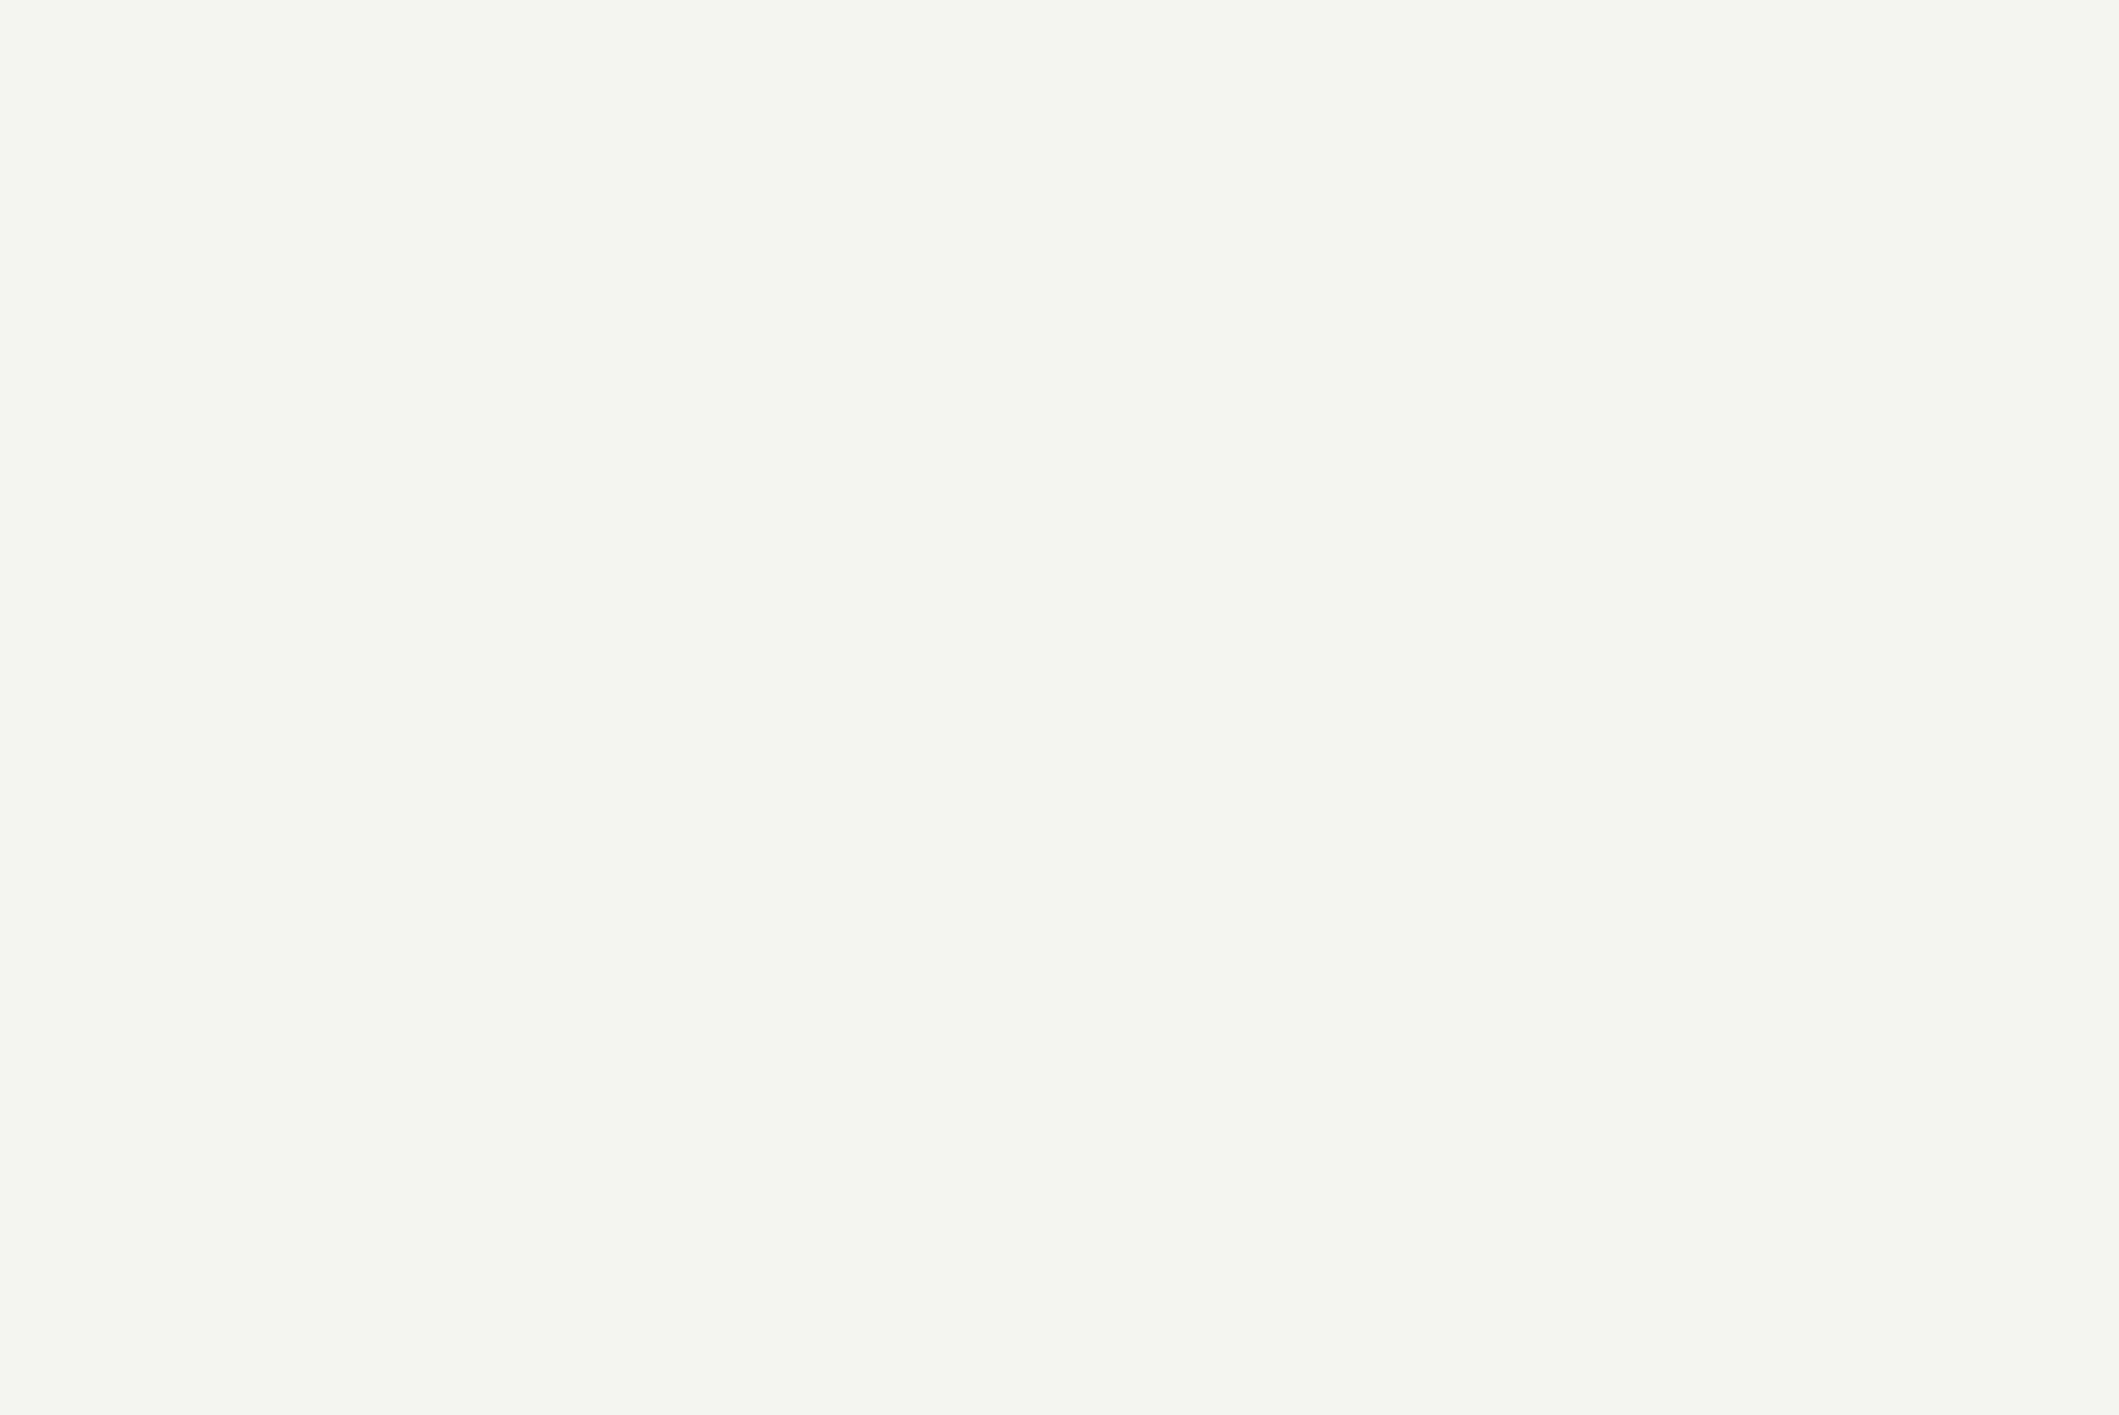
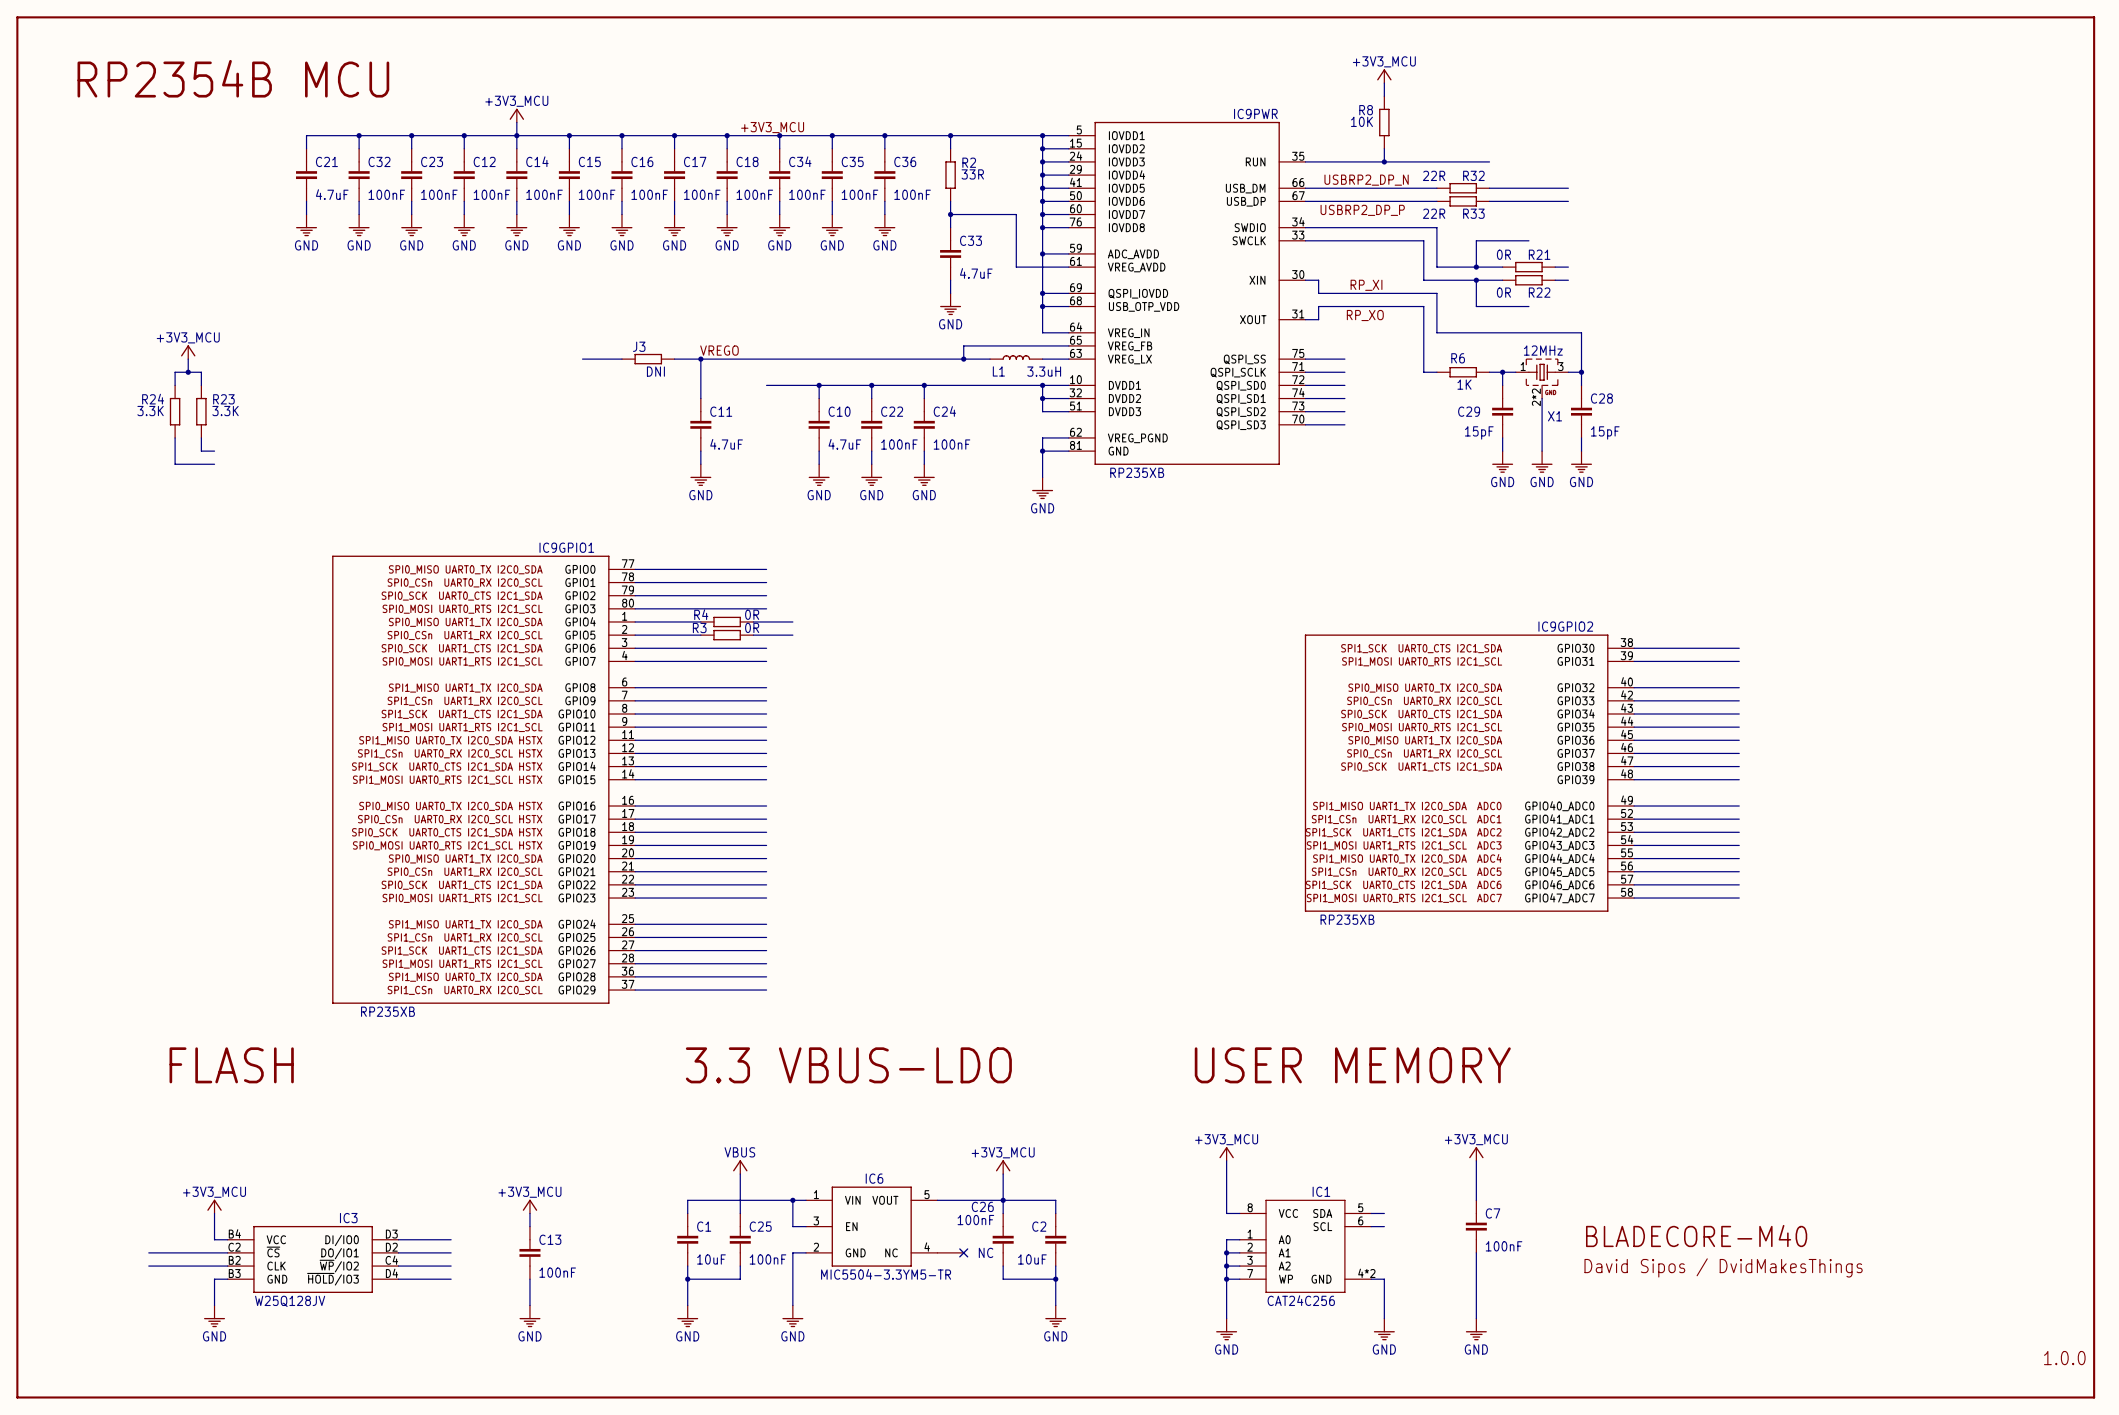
power symbol: none -> +3V3_MCU (1384, 76)
text: none -> RP2354B MCU (233, 78)
wire: none -> (1384, 83) (1384, 96)
power symbol: none -> +3V3_MCU (516, 115)
wire: none -> (516, 122) (516, 148)
R8: none -> 10K (1384, 122)
label: none -> +3V3_MCU (772, 127)
wire: none -> (359, 135) (359, 148)
junction: none -> (359, 135)
wire: none -> (411, 135) (411, 148)
junction: none -> (411, 135)
wire: none -> (464, 135) (464, 148)
junction: none -> (464, 135)
junction: none -> (516, 135)
wire: none -> (569, 135) (569, 148)
junction: none -> (569, 135)
wire: none -> (621, 135) (621, 148)
junction: none -> (621, 135)
wire: none -> (674, 135) (674, 148)
junction: none -> (674, 135)
wire: none -> (727, 135) (727, 148)
junction: none -> (727, 135)
wire: none -> (779, 135) (779, 148)
junction: none -> (779, 135)
wire: none -> (832, 135) (832, 148)
junction: none -> (832, 135)
wire: none -> (884, 135) (884, 148)
junction: none -> (884, 135)
wire: none -> (950, 135) (950, 148)
junction: none -> (950, 135)
wire: none -> (1042, 135) (1042, 332) (1068, 332)
junction: none -> (1042, 135)
wire: none -> (1068, 135) (306, 135) (306, 148)
wire: none -> (1042, 148) (1068, 148)
junction: none -> (1042, 148)
wire: none -> (1384, 148) (1384, 161)
wire: none -> (1042, 161) (1068, 161)
junction: none -> (1042, 161)
wire: none -> (1305, 161) (1489, 161)
junction: none -> (1384, 161)
C21: none -> 4.7uF (306, 175)
C32: none -> 100nF (359, 175)
C23: none -> 100nF (411, 175)
C12: none -> 100nF (464, 175)
C14: none -> 100nF (516, 175)
C15: none -> 100nF (569, 175)
C16: none -> 100nF (621, 175)
C17: none -> 100nF (674, 175)
C18: none -> 100nF (727, 175)
C34: none -> 100nF (779, 175)
C35: none -> 100nF (832, 175)
C36: none -> 100nF (884, 175)
R2: none -> 33R (950, 175)
wire: none -> (1042, 175) (1068, 175)
junction: none -> (1042, 175)
label: none -> USBRP2_DP_N (1366, 180)
wire: none -> (1042, 188) (1068, 188)
junction: none -> (1042, 188)
wire: none -> (1305, 188) (1436, 188)
R32: none -> 22R (1463, 188)
wire: none -> (1489, 188) (1568, 188)
wire: none -> (306, 201) (306, 214)
wire: none -> (359, 201) (359, 214)
wire: none -> (411, 201) (411, 214)
wire: none -> (464, 201) (464, 214)
wire: none -> (516, 201) (516, 214)
wire: none -> (569, 201) (569, 214)
wire: none -> (621, 201) (621, 214)
wire: none -> (674, 201) (674, 214)
wire: none -> (727, 201) (727, 214)
wire: none -> (779, 201) (779, 214)
wire: none -> (832, 201) (832, 214)
wire: none -> (884, 201) (884, 214)
wire: none -> (950, 201) (950, 227)
wire: none -> (1042, 201) (1068, 201)
junction: none -> (1042, 201)
wire: none -> (1305, 201) (1436, 201)
R33: none -> 22R (1463, 201)
wire: none -> (1489, 201) (1568, 201)
label: none -> USBRP2_DP_P (1362, 210)
wire: none -> (950, 214) (1016, 214) (1016, 267) (1068, 267)
junction: none -> (950, 214)
wire: none -> (1042, 214) (1068, 214)
junction: none -> (1042, 214)
power symbol: none -> GND (306, 225)
power symbol: none -> GND (359, 225)
power symbol: none -> GND (411, 225)
power symbol: none -> GND (464, 225)
power symbol: none -> GND (516, 225)
power symbol: none -> GND (569, 225)
power symbol: none -> GND (621, 225)
power symbol: none -> GND (674, 225)
power symbol: none -> GND (727, 225)
power symbol: none -> GND (779, 225)
power symbol: none -> GND (832, 225)
power symbol: none -> GND (884, 225)
wire: none -> (1042, 227) (1068, 227)
junction: none -> (1042, 227)
wire: none -> (1305, 227) (1436, 227) (1436, 267) (1502, 267)
wire: none -> (1305, 240) (1423, 240) (1423, 280) (1502, 280)
wire: none -> (1528, 240) (1476, 240) (1476, 267)
C33: none -> 4.7uF (950, 253)
wire: none -> (1042, 253) (1068, 253)
junction: none -> (1042, 253)
junction: none -> (1476, 267)
R21: none -> 0R (1528, 267)
wire: none -> (1555, 267) (1568, 267)
wire: none -> (950, 280) (950, 293)
wire: none -> (1305, 280) (1318, 280) (1318, 293) (1436, 293) (1436, 332) (1581, 332) (1581, 385)
wire: none -> (1476, 280) (1476, 306) (1528, 306)
junction: none -> (1476, 280)
R22: none -> 0R (1528, 280)
wire: none -> (1555, 280) (1568, 280)
label: none -> RP_XI (1366, 285)
wire: none -> (1042, 293) (1068, 293)
junction: none -> (1042, 293)
IC9PWR: none -> RP235XB (1187, 293)
power symbol: none -> GND (950, 304)
wire: none -> (1042, 306) (1068, 306)
junction: none -> (1042, 306)
label: none -> RP_XO (1365, 315)
wire: none -> (1305, 319) (1318, 319) (1318, 306) (1423, 306) (1423, 372) (1436, 372)
wire: none -> (1068, 345) (963, 345) (963, 359)
label: none -> VREGO (719, 350)
power symbol: none -> +3V3_MCU (188, 352)
L1: none -> 3.3uH (1016, 357)
wire: none -> (188, 359) (188, 372)
wire: none -> (582, 359) (621, 359)
J3: none -> DNI (648, 359)
wire: none -> (674, 359) (990, 359)
wire: none -> (700, 359) (700, 398)
junction: none -> (700, 359)
junction: none -> (963, 359)
wire: none -> (1042, 359) (1068, 359)
wire: none -> (1305, 359) (1344, 359)
junction: none -> (188, 372)
wire: none -> (1305, 372) (1344, 372)
R6: none -> 1K (1463, 372)
wire: none -> (1489, 372) (1515, 372)
wire: none -> (1502, 372) (1502, 385)
junction: none -> (1502, 372)
wire: none -> (1568, 372) (1581, 372)
junction: none -> (1581, 372)
X1: none -> 12MHz (1542, 378)
wire: none -> (175, 385) (175, 372) (201, 372) (201, 385)
wire: none -> (766, 385) (1068, 385)
wire: none -> (819, 385) (819, 398)
junction: none -> (819, 385)
wire: none -> (871, 385) (871, 398)
junction: none -> (871, 385)
wire: none -> (924, 385) (924, 398)
junction: none -> (924, 385)
wire: none -> (1042, 385) (1042, 411) (1068, 411)
junction: none -> (1042, 385)
wire: none -> (1305, 385) (1344, 385)
wire: none -> (1042, 398) (1068, 398)
junction: none -> (1042, 398)
wire: none -> (1305, 398) (1344, 398)
wire: none -> (1542, 398) (1542, 451)
R24: none -> 3.3K (175, 411)
R23: none -> 3.3K (201, 411)
wire: none -> (1305, 411) (1344, 411)
C29: none -> 15pF (1502, 411)
C28: none -> 15pF (1581, 411)
C11: none -> 4.7uF (700, 424)
C10: none -> 4.7uF (819, 424)
C22: none -> 100nF (871, 424)
C24: none -> 100nF (924, 424)
wire: none -> (1305, 424) (1344, 424)
wire: none -> (175, 437) (175, 464) (214, 464)
wire: none -> (201, 437) (201, 451) (214, 451)
wire: none -> (1068, 437) (1042, 437) (1042, 477)
wire: none -> (1502, 437) (1502, 451)
wire: none -> (1581, 437) (1581, 451)
wire: none -> (700, 451) (700, 464)
wire: none -> (819, 451) (819, 464)
wire: none -> (871, 451) (871, 464)
wire: none -> (924, 451) (924, 464)
wire: none -> (1042, 451) (1068, 451)
junction: none -> (1042, 451)
power symbol: none -> GND (1502, 461)
power symbol: none -> GND (1542, 461)
power symbol: none -> GND (1581, 461)
power symbol: none -> GND (700, 475)
power symbol: none -> GND (819, 475)
power symbol: none -> GND (871, 475)
power symbol: none -> GND (924, 475)
power symbol: none -> GND (1042, 488)
wire: none -> (635, 569) (766, 569)
wire: none -> (635, 582) (766, 582)
wire: none -> (635, 595) (766, 595)
wire: none -> (635, 608) (766, 608)
wire: none -> (635, 621) (700, 621)
R4: none -> 0R (727, 621)
wire: none -> (753, 621) (792, 621)
wire: none -> (635, 635) (700, 635)
R3: none -> 0R (727, 635)
wire: none -> (753, 635) (792, 635)
wire: none -> (635, 648) (766, 648)
wire: none -> (1634, 648) (1739, 648)
wire: none -> (635, 661) (766, 661)
wire: none -> (1634, 661) (1739, 661)
wire: none -> (635, 687) (766, 687)
wire: none -> (1634, 687) (1739, 687)
wire: none -> (635, 700) (766, 700)
wire: none -> (1634, 700) (1739, 700)
part: none -> (1055, 707)
wire: none -> (635, 713) (766, 713)
wire: none -> (1634, 713) (1739, 713)
wire: none -> (635, 727) (766, 727)
wire: none -> (1634, 727) (1739, 727)
wire: none -> (635, 740) (766, 740)
wire: none -> (1634, 740) (1739, 740)
wire: none -> (635, 753) (766, 753)
wire: none -> (1634, 753) (1739, 753)
wire: none -> (635, 766) (766, 766)
wire: none -> (1634, 766) (1739, 766)
IC9GPIO2: none -> RP235XB (1469, 773)
IC9GPIO1: none -> RP235XB (483, 779)
wire: none -> (635, 779) (766, 779)
wire: none -> (1634, 779) (1739, 779)
wire: none -> (635, 806) (766, 806)
wire: none -> (1634, 806) (1739, 806)
wire: none -> (635, 819) (766, 819)
wire: none -> (1634, 819) (1739, 819)
wire: none -> (635, 832) (766, 832)
wire: none -> (1634, 832) (1739, 832)
wire: none -> (635, 845) (766, 845)
wire: none -> (1634, 845) (1739, 845)
wire: none -> (635, 858) (766, 858)
wire: none -> (1634, 858) (1739, 858)
wire: none -> (635, 871) (766, 871)
wire: none -> (1634, 871) (1739, 871)
wire: none -> (635, 884) (766, 884)
wire: none -> (1634, 884) (1739, 884)
wire: none -> (635, 898) (766, 898)
wire: none -> (1634, 898) (1739, 898)
wire: none -> (635, 924) (766, 924)
wire: none -> (635, 937) (766, 937)
wire: none -> (635, 950) (766, 950)
wire: none -> (635, 963) (766, 963)
wire: none -> (635, 976) (766, 976)
wire: none -> (635, 990) (766, 990)
text: none -> FLASH (231, 1065)
text: none -> 3.3 VBUS-LDO (848, 1065)
text: none -> USER MEMORY (1352, 1065)
power symbol: none -> +3V3_MCU (1226, 1153)
power symbol: none -> +3V3_MCU (1476, 1153)
wire: none -> (1226, 1160) (1226, 1213) (1239, 1213)
wire: none -> (1476, 1160) (1476, 1200)
power symbol: none -> VBUS (740, 1167)
power symbol: none -> +3V3_MCU (1003, 1167)
wire: none -> (740, 1174) (740, 1213)
wire: none -> (1003, 1174) (1003, 1213)
wire: none -> (792, 1200) (792, 1226) (806, 1226)
junction: none -> (792, 1200)
wire: none -> (806, 1200) (687, 1200) (687, 1213)
wire: none -> (937, 1200) (1055, 1200) (1055, 1213)
junction: none -> (1003, 1200)
power symbol: none -> +3V3_MCU (214, 1206)
power symbol: none -> +3V3_MCU (529, 1206)
wire: none -> (214, 1213) (214, 1239) (227, 1239)
wire: none -> (529, 1213) (529, 1226)
wire: none -> (1371, 1213) (1384, 1213)
IC6: none -> (871, 1226)
wire: none -> (1371, 1226) (1384, 1226)
C7: none -> 100nF (1476, 1226)
text: none -> BLADECORE-M40 (1696, 1236)
wire: none -> (398, 1239) (451, 1239)
C1: none -> 10uF (687, 1239)
C25: none -> 100nF (740, 1239)
C26: none -> 100nF (1003, 1239)
C2: none -> 10uF (1055, 1239)
wire: none -> (1239, 1239) (1226, 1239) (1226, 1318)
IC1: none -> (1305, 1246)
wire: none -> (148, 1252) (227, 1252)
wire: none -> (398, 1252) (451, 1252)
C13: none -> 100nF (529, 1252)
wire: none -> (806, 1252) (792, 1252) (792, 1305)
part: none -> (952, 1252)
wire: none -> (1226, 1252) (1239, 1252)
junction: none -> (1226, 1252)
wire: none -> (1476, 1252) (1476, 1318)
IC3: none -> (313, 1259)
wire: none -> (148, 1266) (227, 1266)
wire: none -> (398, 1266) (451, 1266)
wire: none -> (687, 1266) (687, 1305)
wire: none -> (740, 1266) (740, 1279) (687, 1279)
wire: none -> (1003, 1266) (1003, 1279) (1055, 1279)
wire: none -> (1055, 1266) (1055, 1305)
wire: none -> (1226, 1266) (1239, 1266)
junction: none -> (1226, 1266)
text: none -> David Sipos / DvidMakesThings (1723, 1267)
wire: none -> (227, 1279) (214, 1279) (214, 1305)
wire: none -> (398, 1279) (451, 1279)
wire: none -> (529, 1279) (529, 1305)
junction: none -> (687, 1279)
junction: none -> (1055, 1279)
wire: none -> (1226, 1279) (1239, 1279)
junction: none -> (1226, 1279)
wire: none -> (1371, 1279) (1384, 1279) (1384, 1318)
power symbol: none -> GND (214, 1316)
power symbol: none -> GND (529, 1316)
power symbol: none -> GND (687, 1316)
power symbol: none -> GND (792, 1316)
power symbol: none -> GND (1055, 1316)
power symbol: none -> GND (1226, 1329)
power symbol: none -> GND (1384, 1329)
power symbol: none -> GND (1476, 1329)
text: none -> 1.0.0 (2064, 1358)

